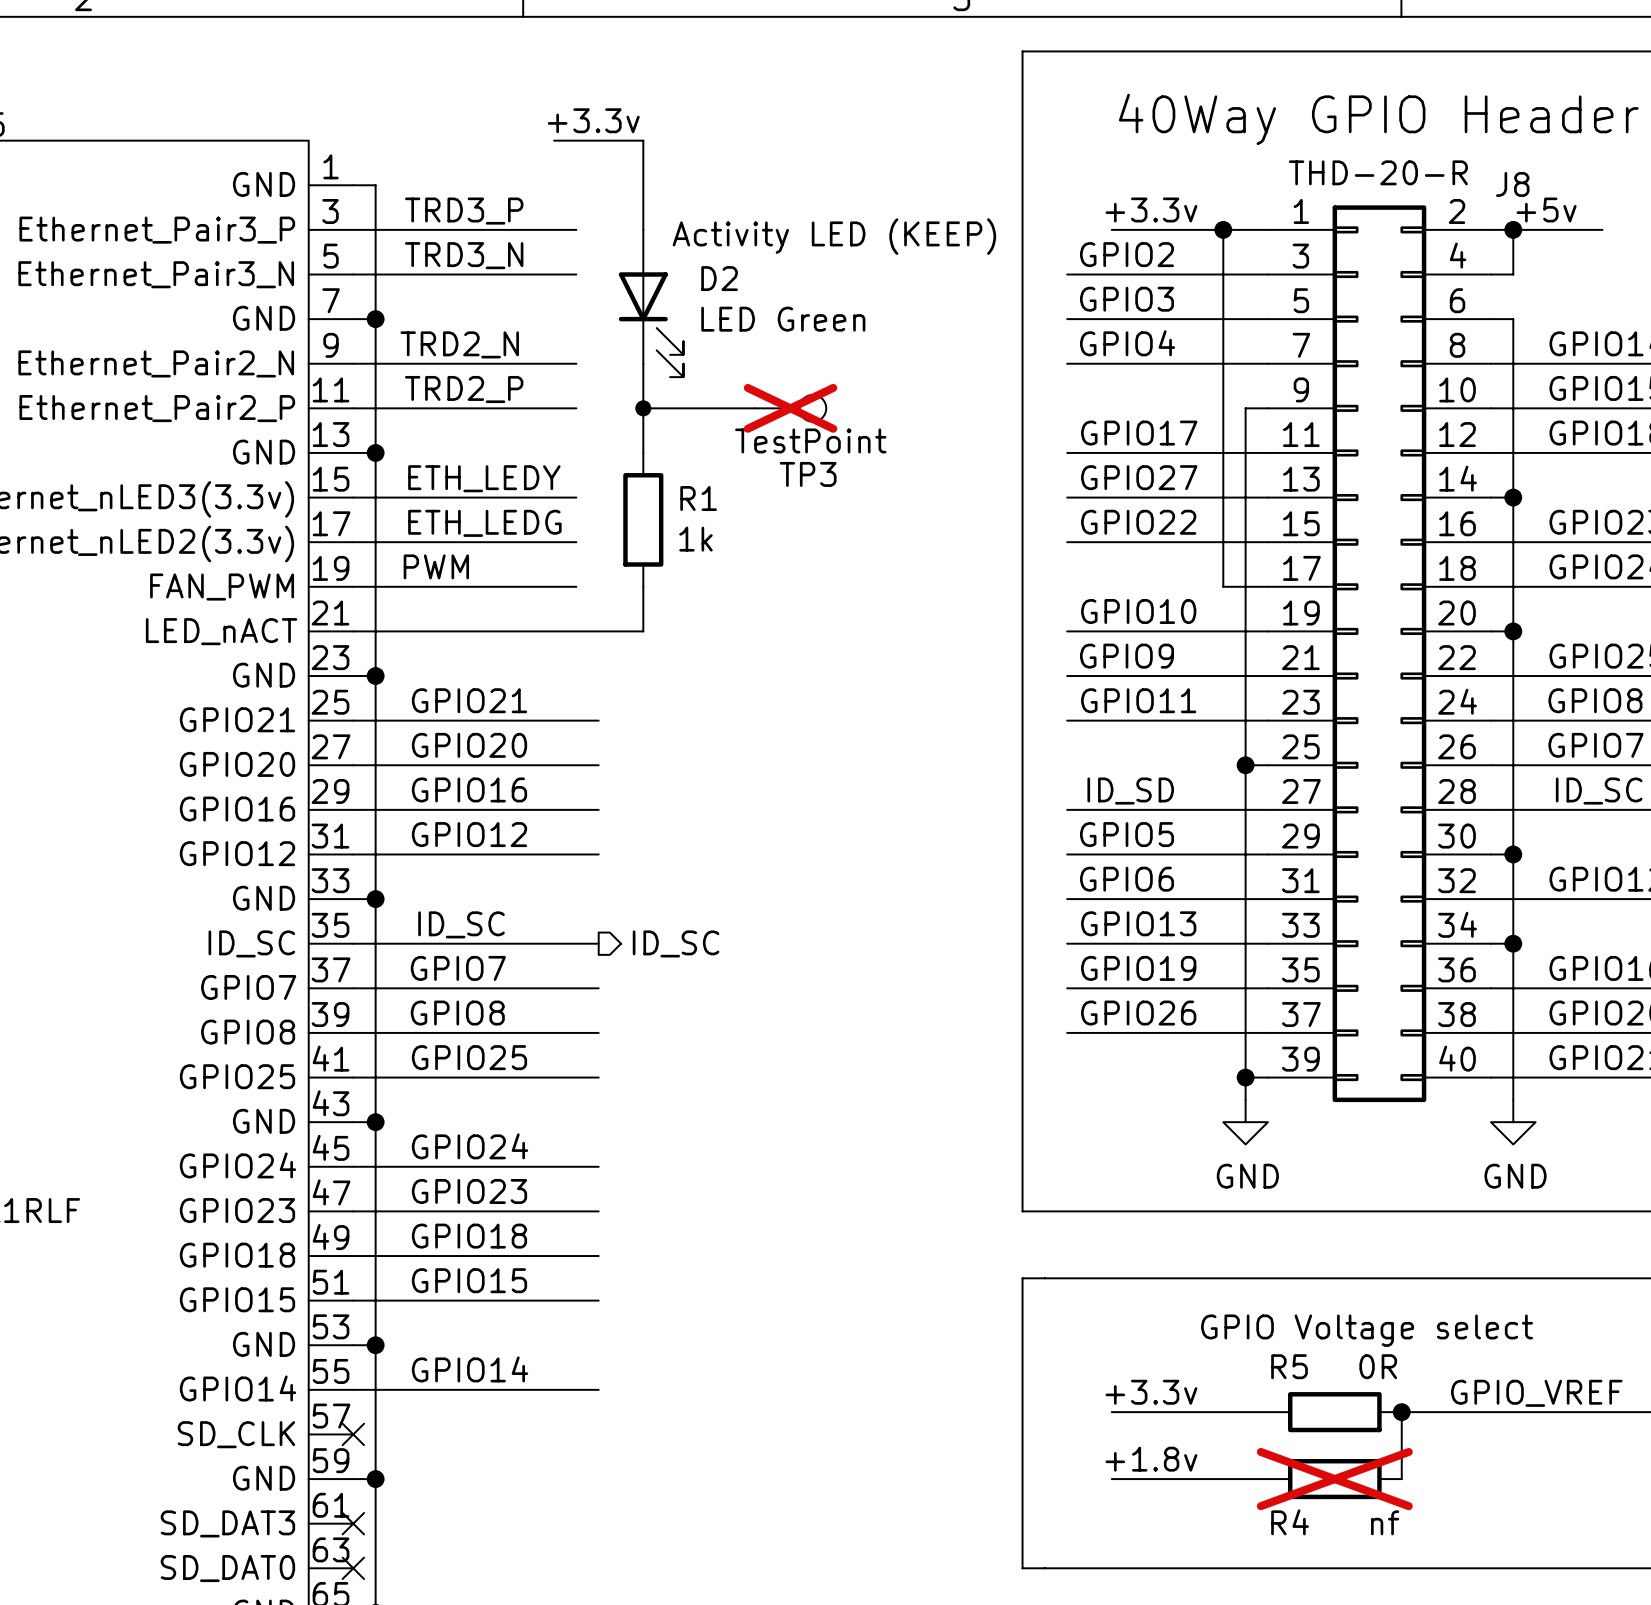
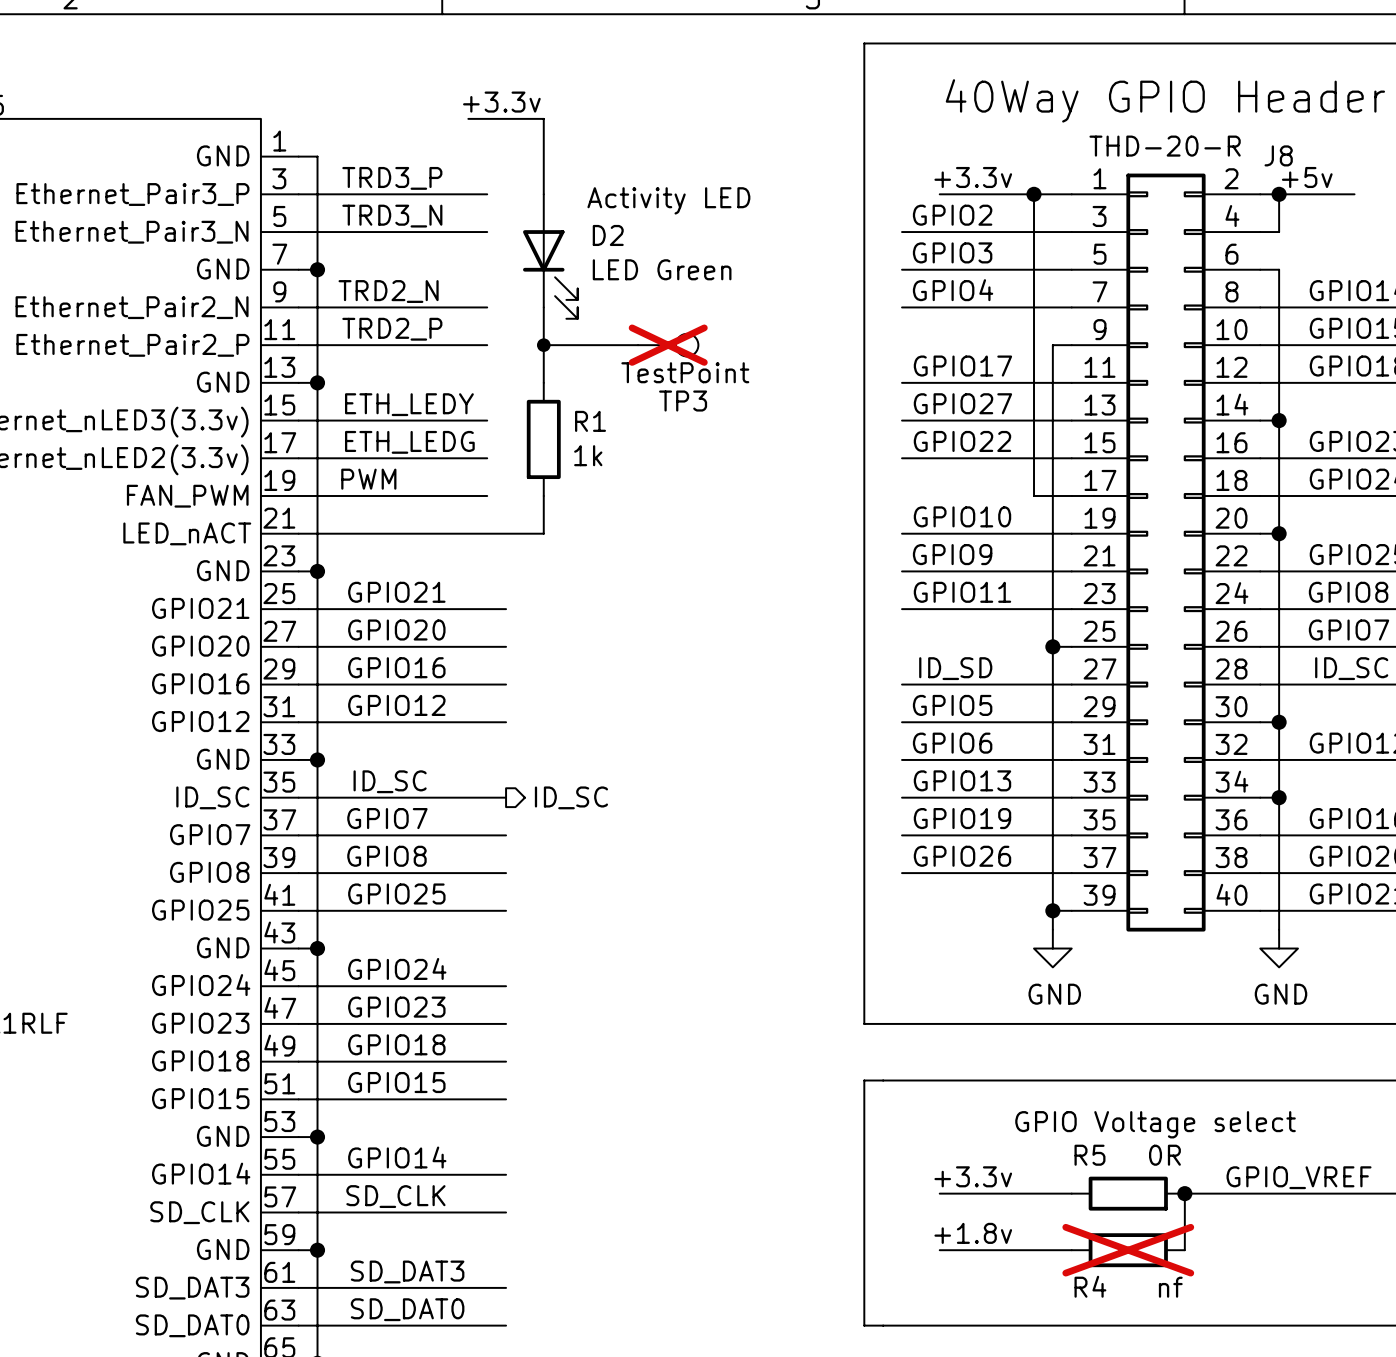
text: Activity LED (KEEP) (834, 236) -> Activity LED (668, 200)
label: none -> SD_CLK (395, 1196)
wire: none -> (298, 1212) (506, 1212)
no-connect mark: (353, 1434) -> none
label: none -> SD_DAT3 (407, 1271)
wire: none -> (298, 1287) (506, 1287)
no-connect mark: (353, 1523) -> none
label: none -> SD_DAT0 (407, 1309)
wire: none -> (298, 1325) (506, 1325)
no-connect mark: (353, 1568) -> none

